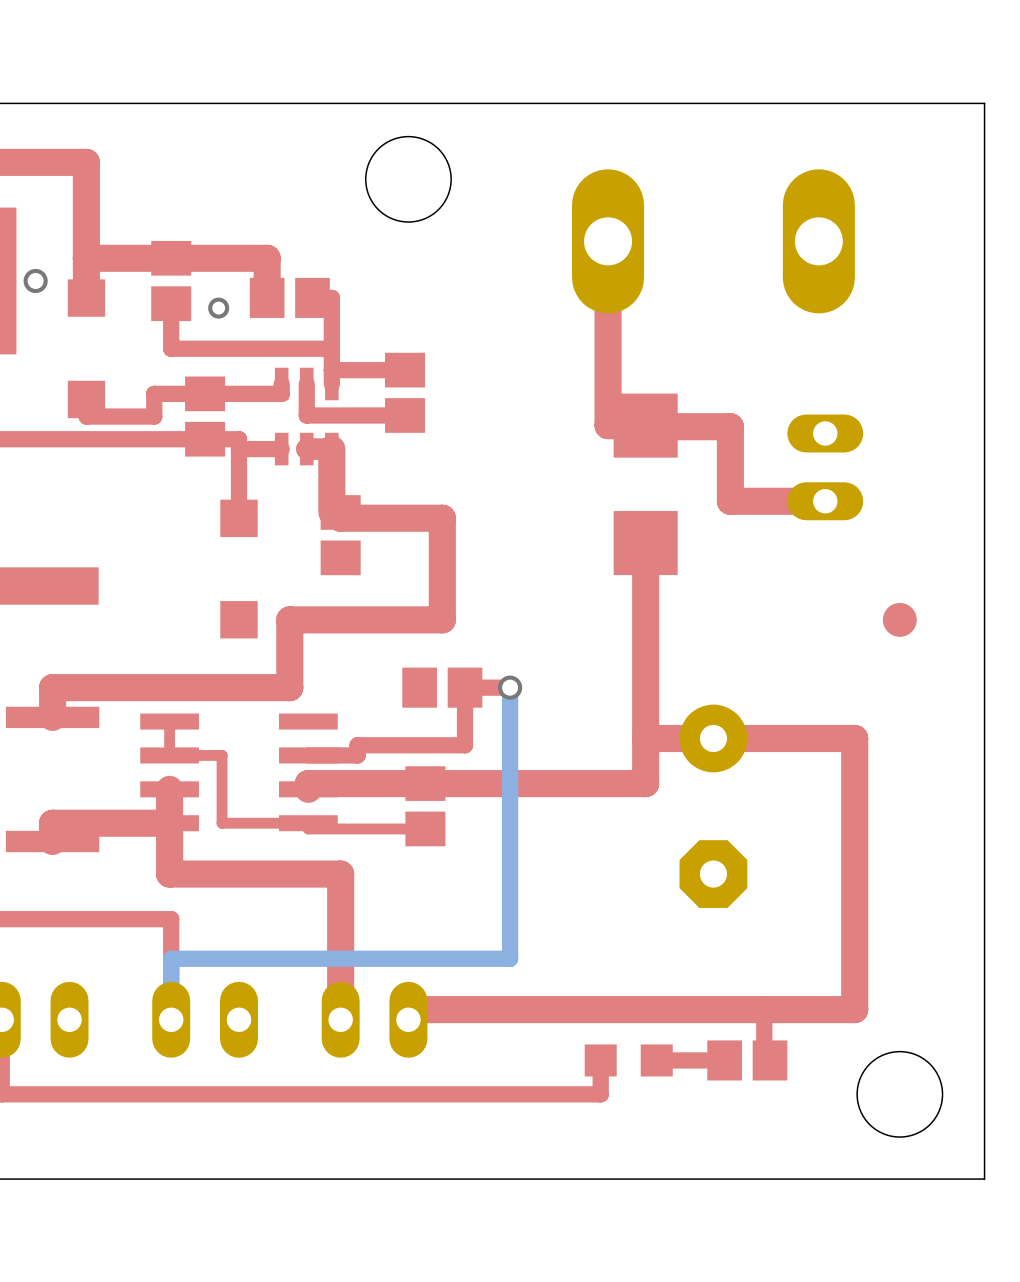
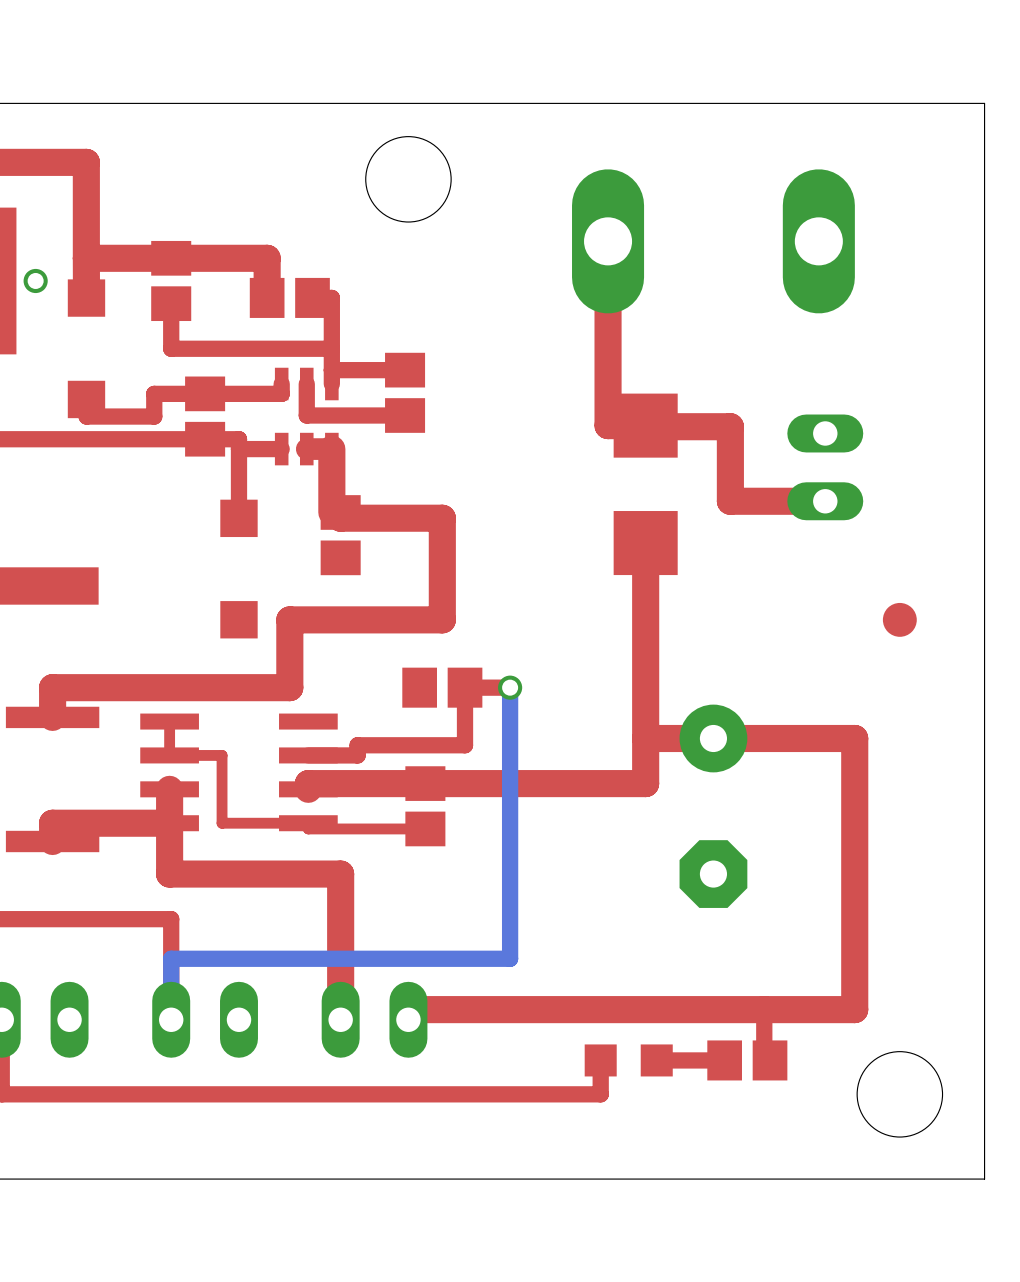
via: (218, 308) -> none

